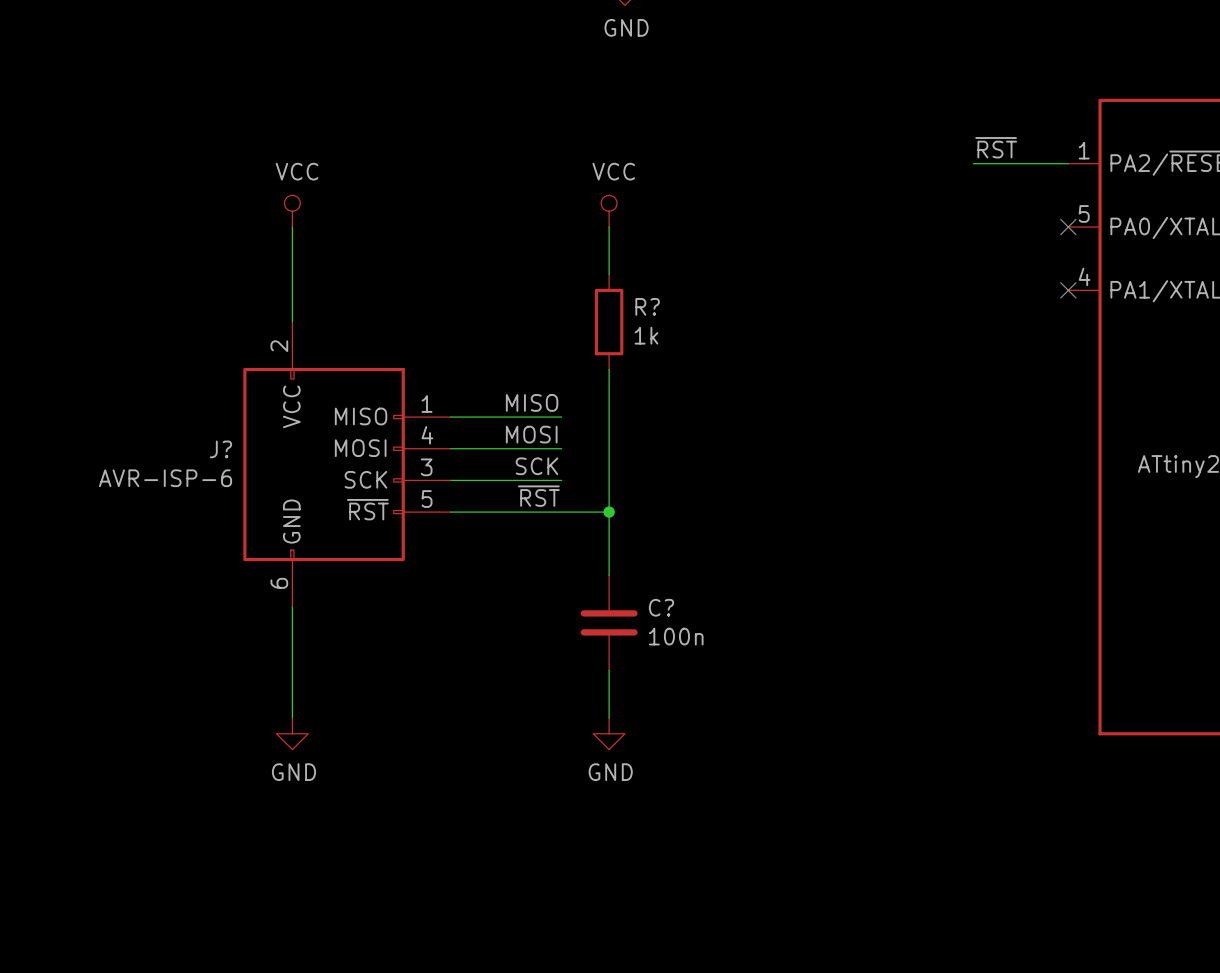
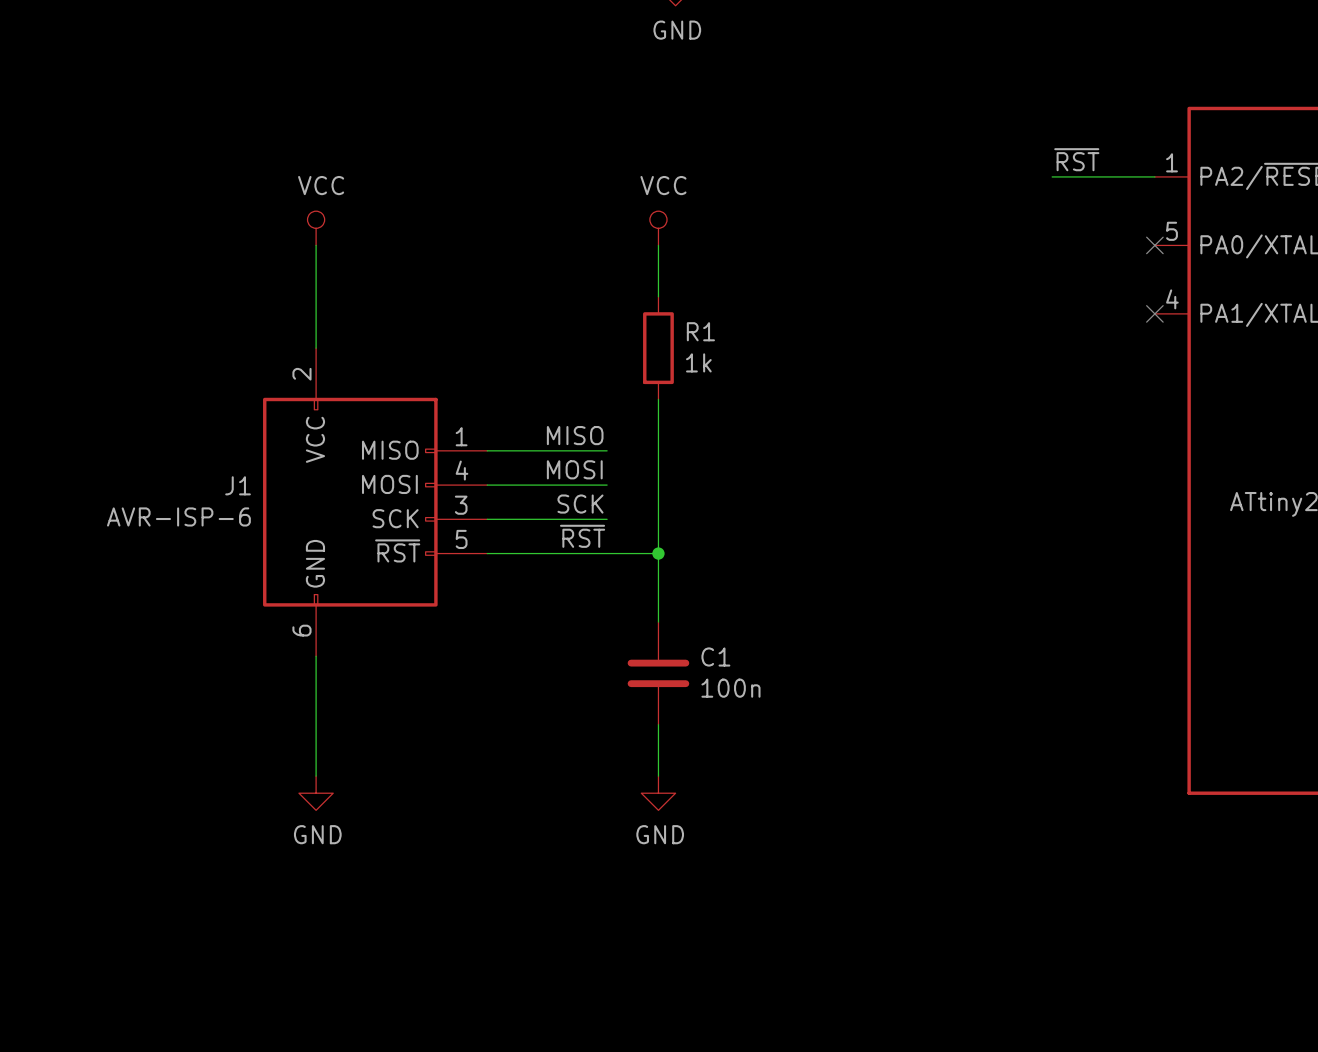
R? name: R? (647, 306) -> R1 (700, 331)
J? name: J? (220, 449) -> J1 (238, 485)
C? name: C? (661, 607) -> C1 (715, 656)

